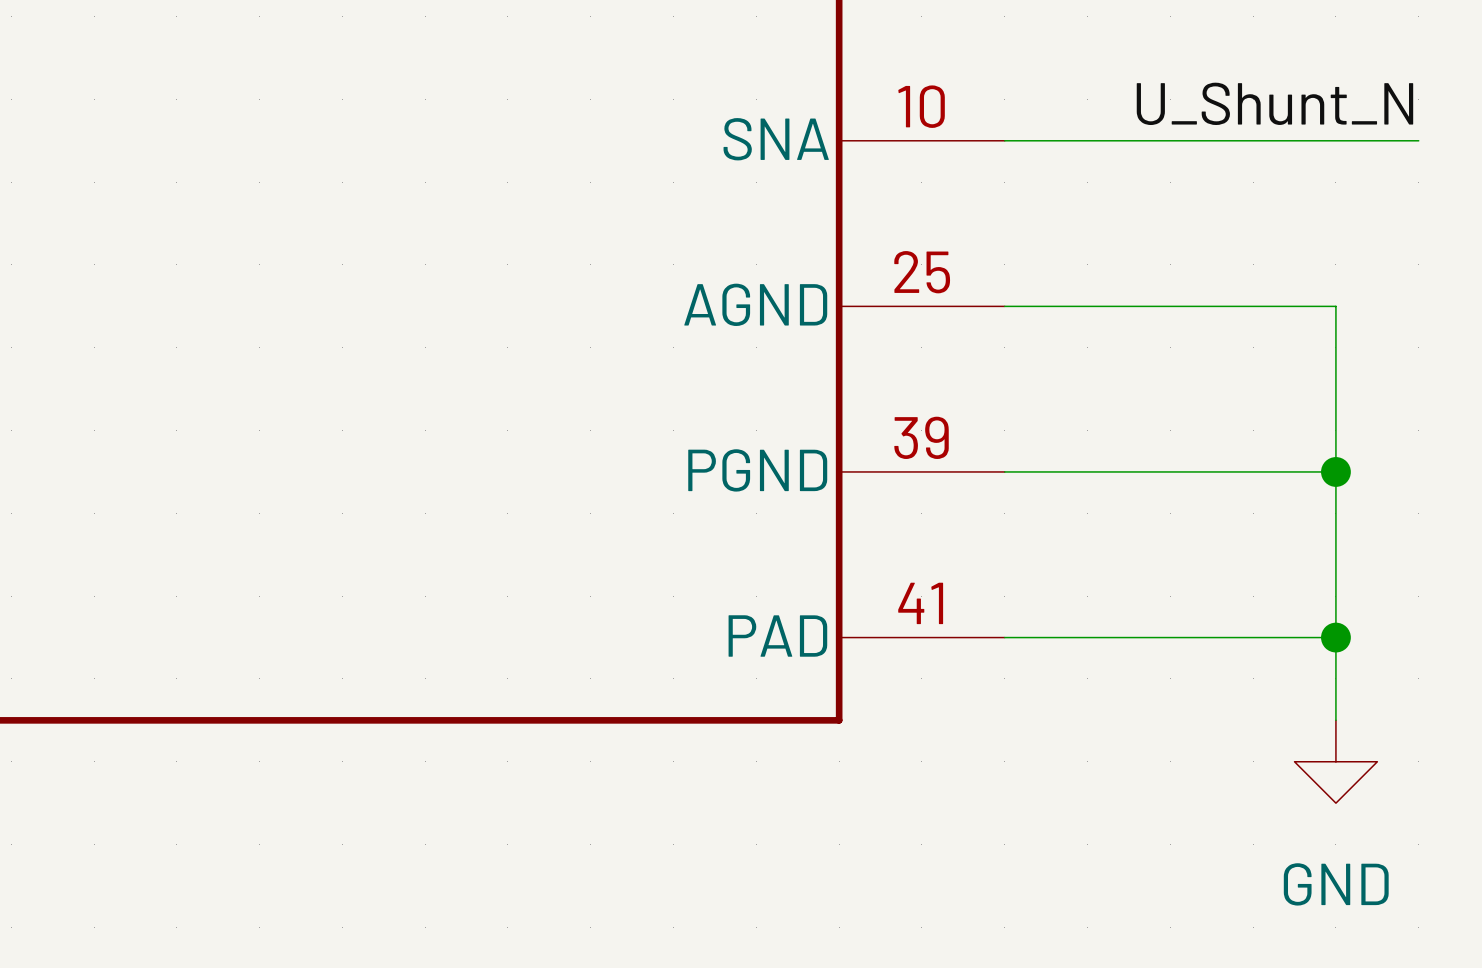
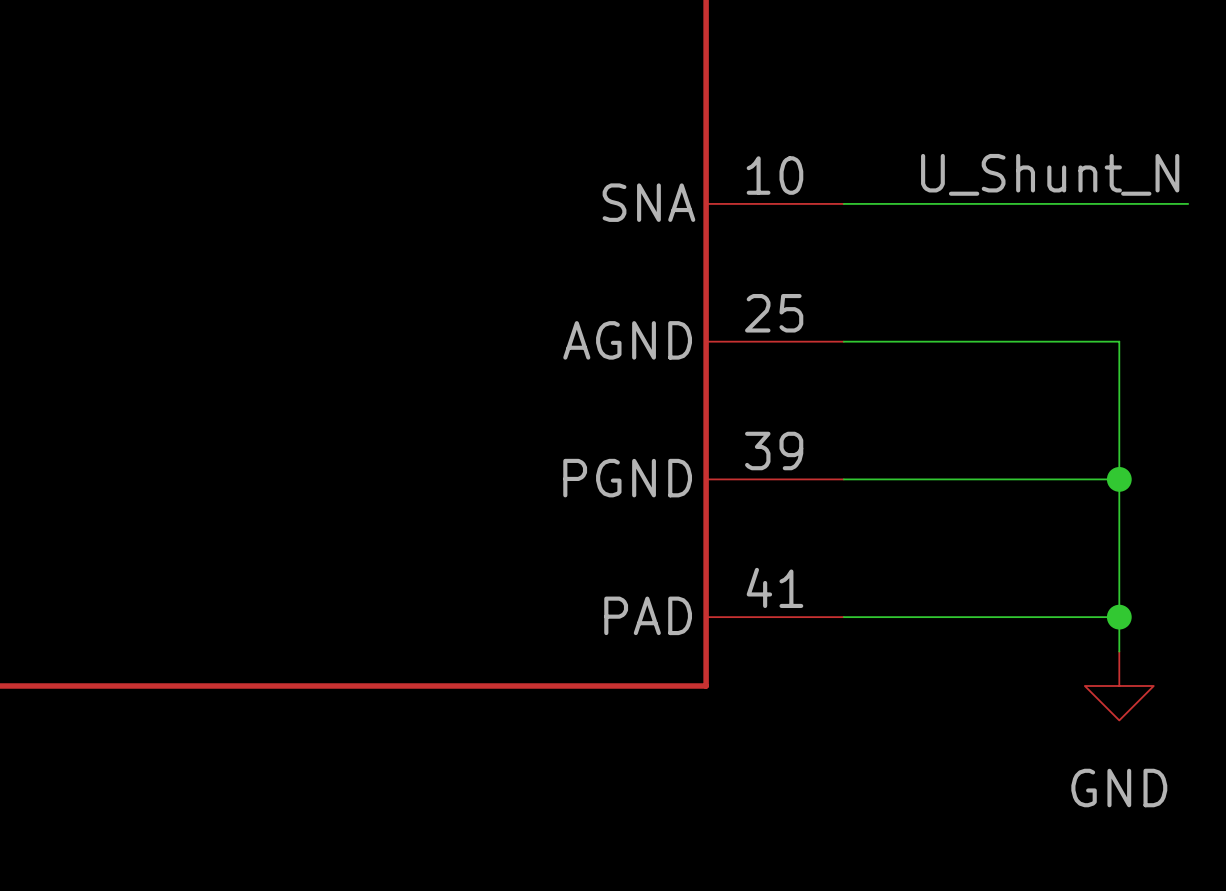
power symbol position: GND (1335, 761) -> GND (1119, 686)

